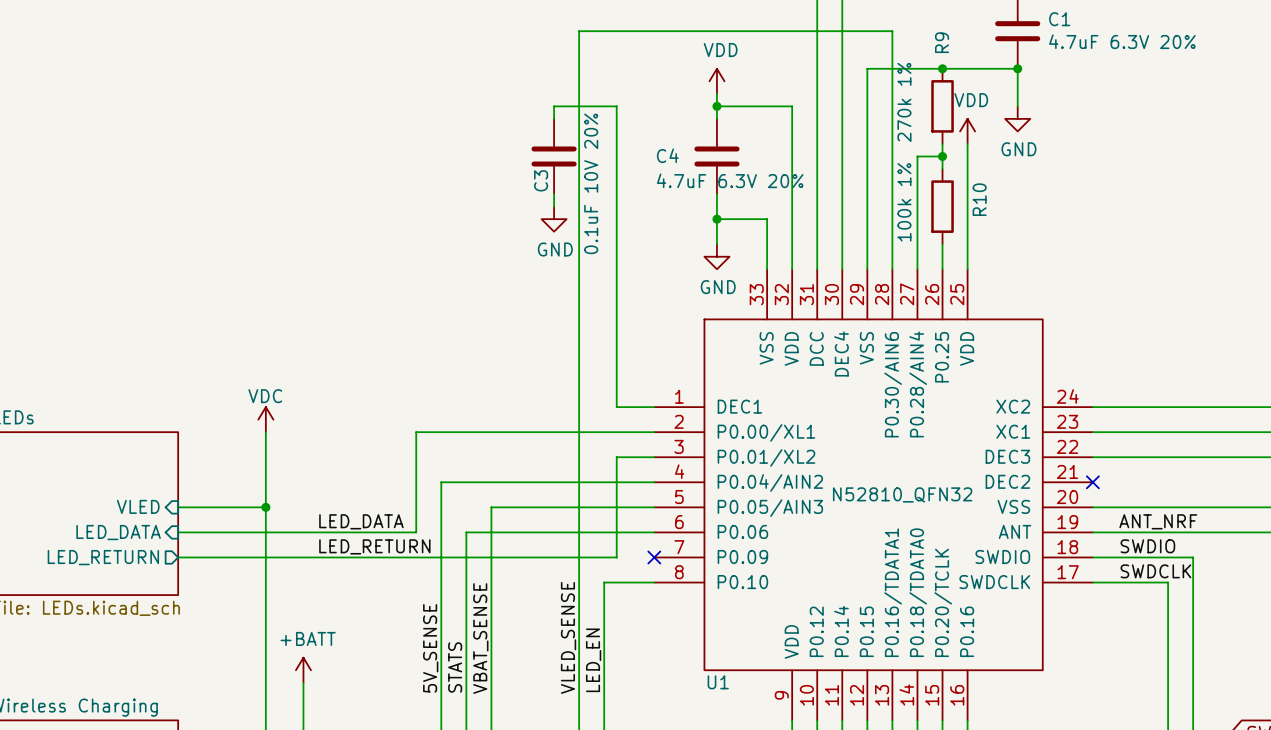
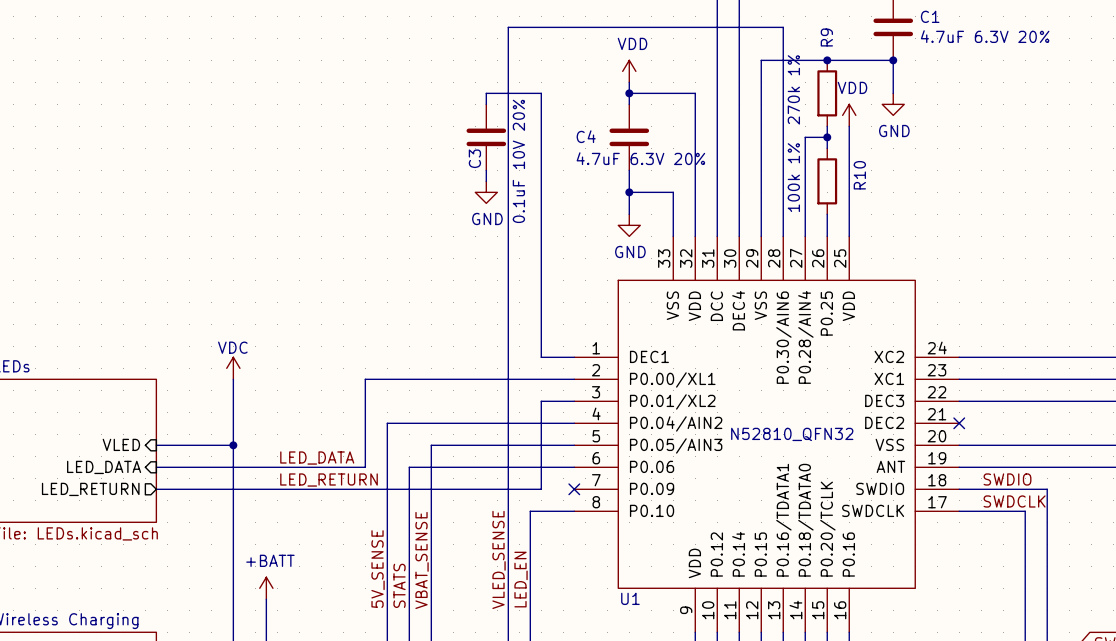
label: ANT_NRF (1158, 521) -> none

